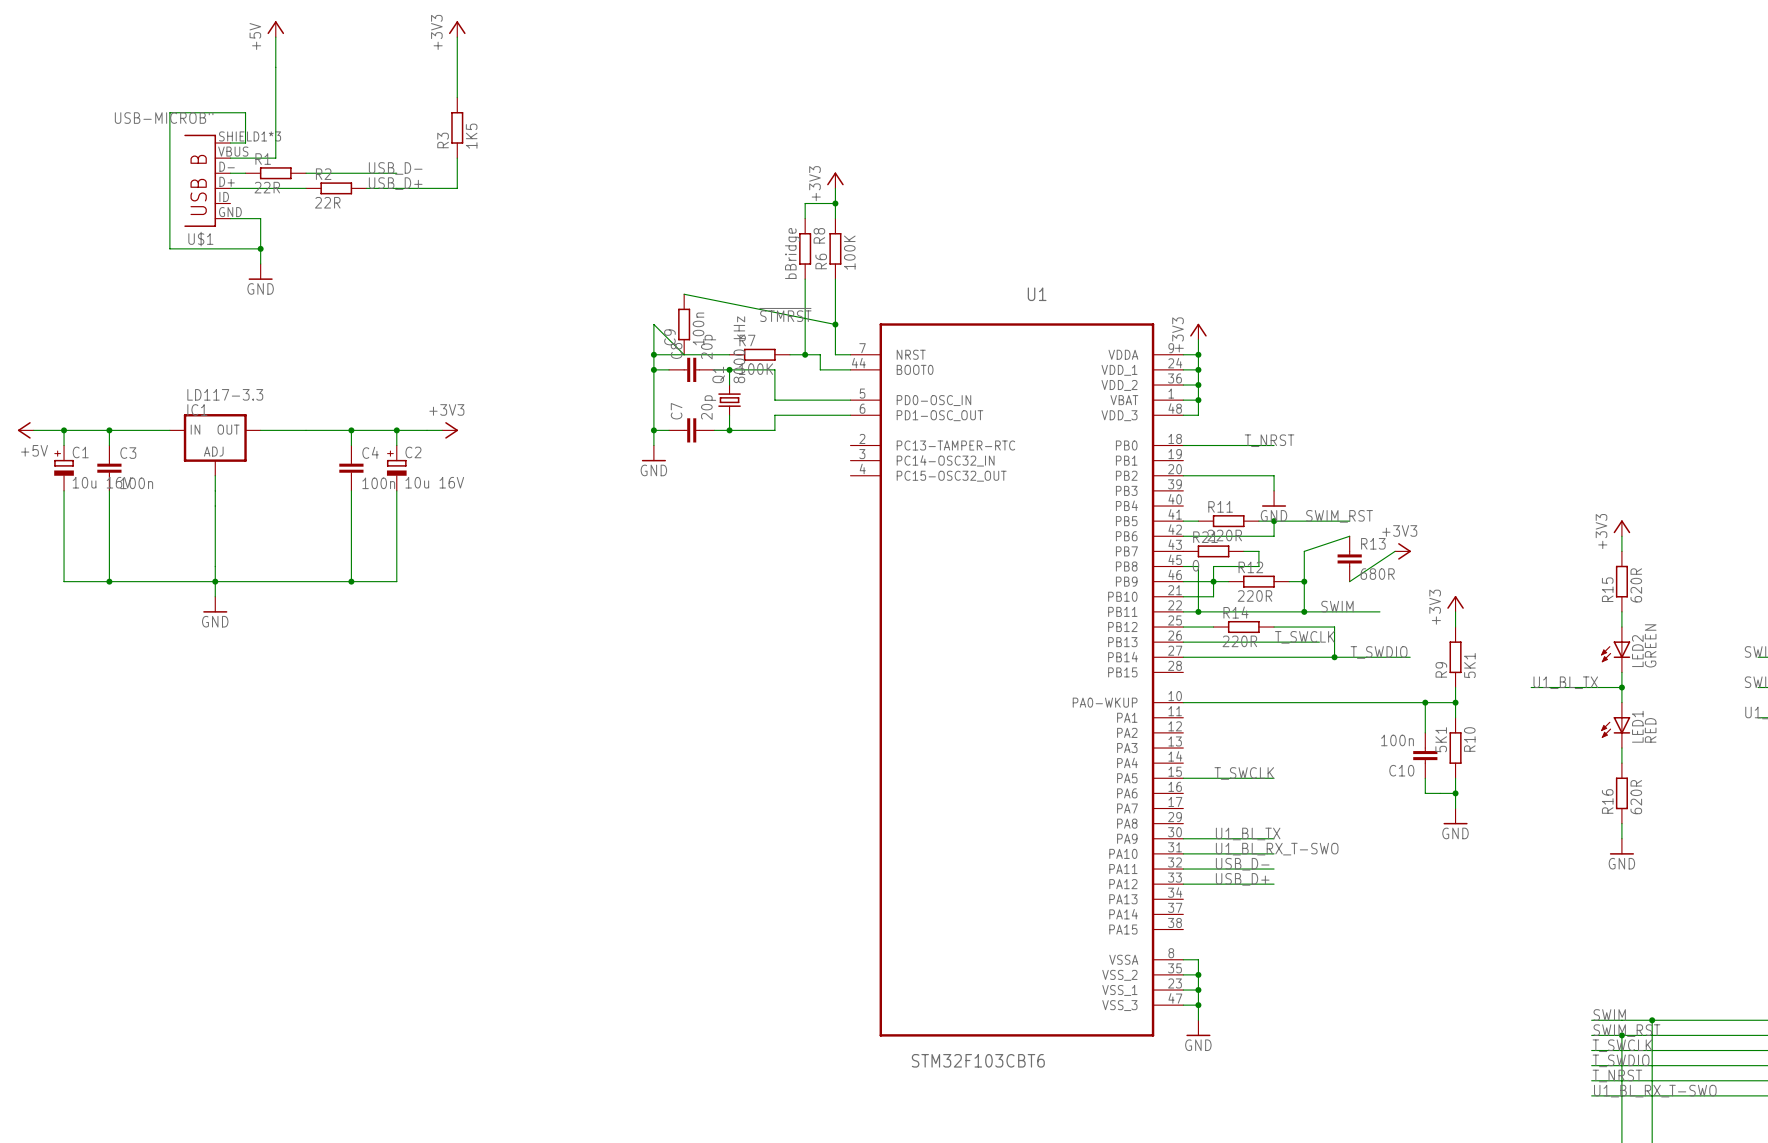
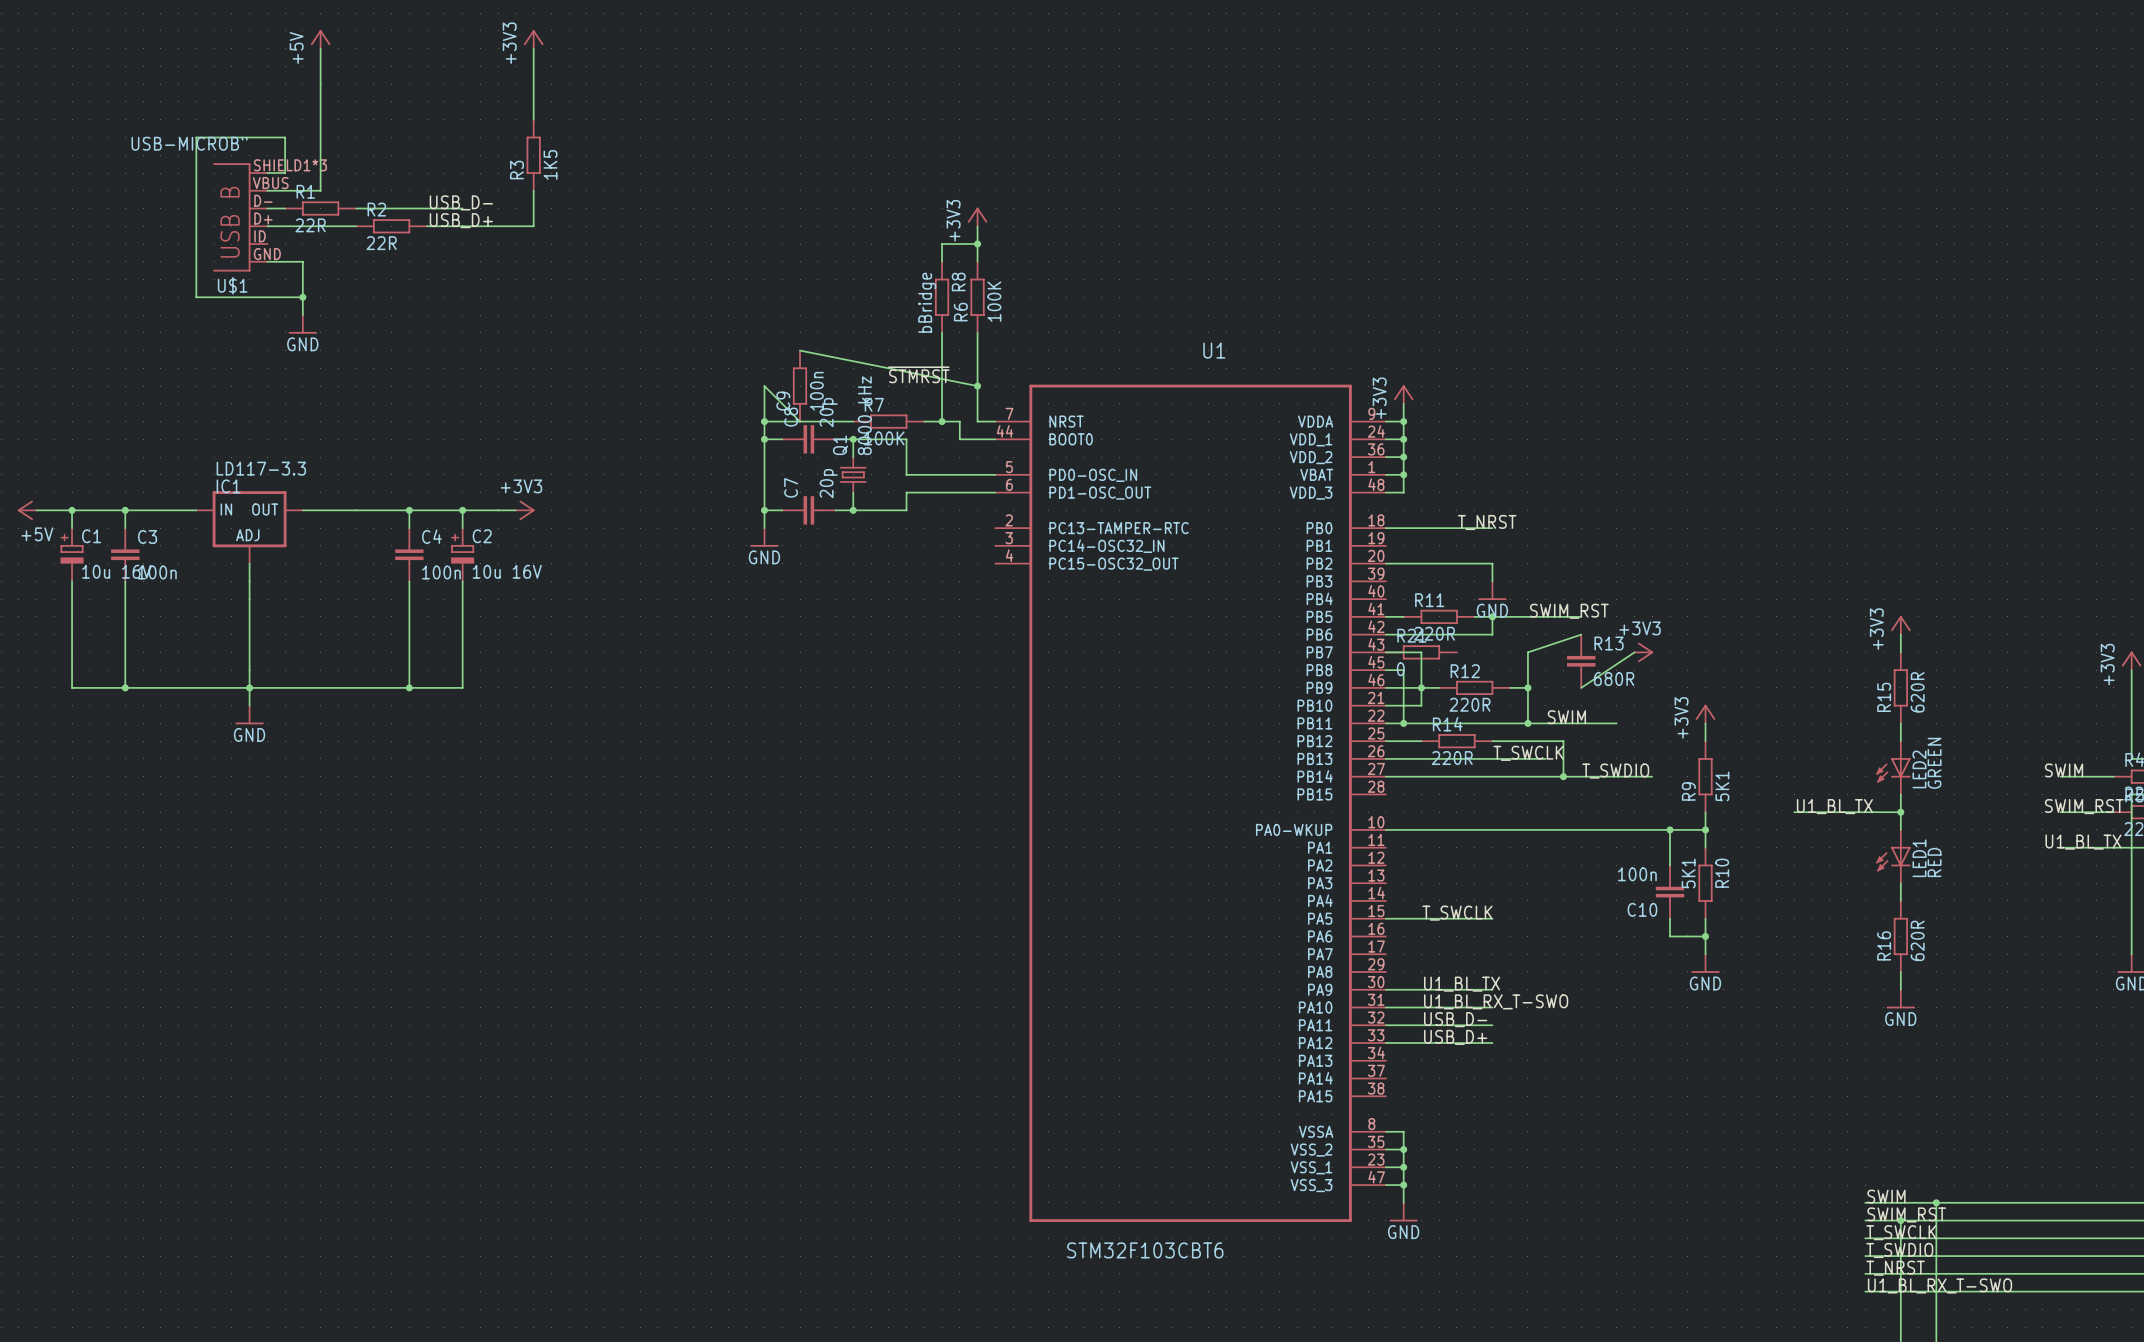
wire: (1243, 551) (1258, 551) (1258, 566) (1213, 566) -> (1385, 652) (1421, 652) (1421, 670)

